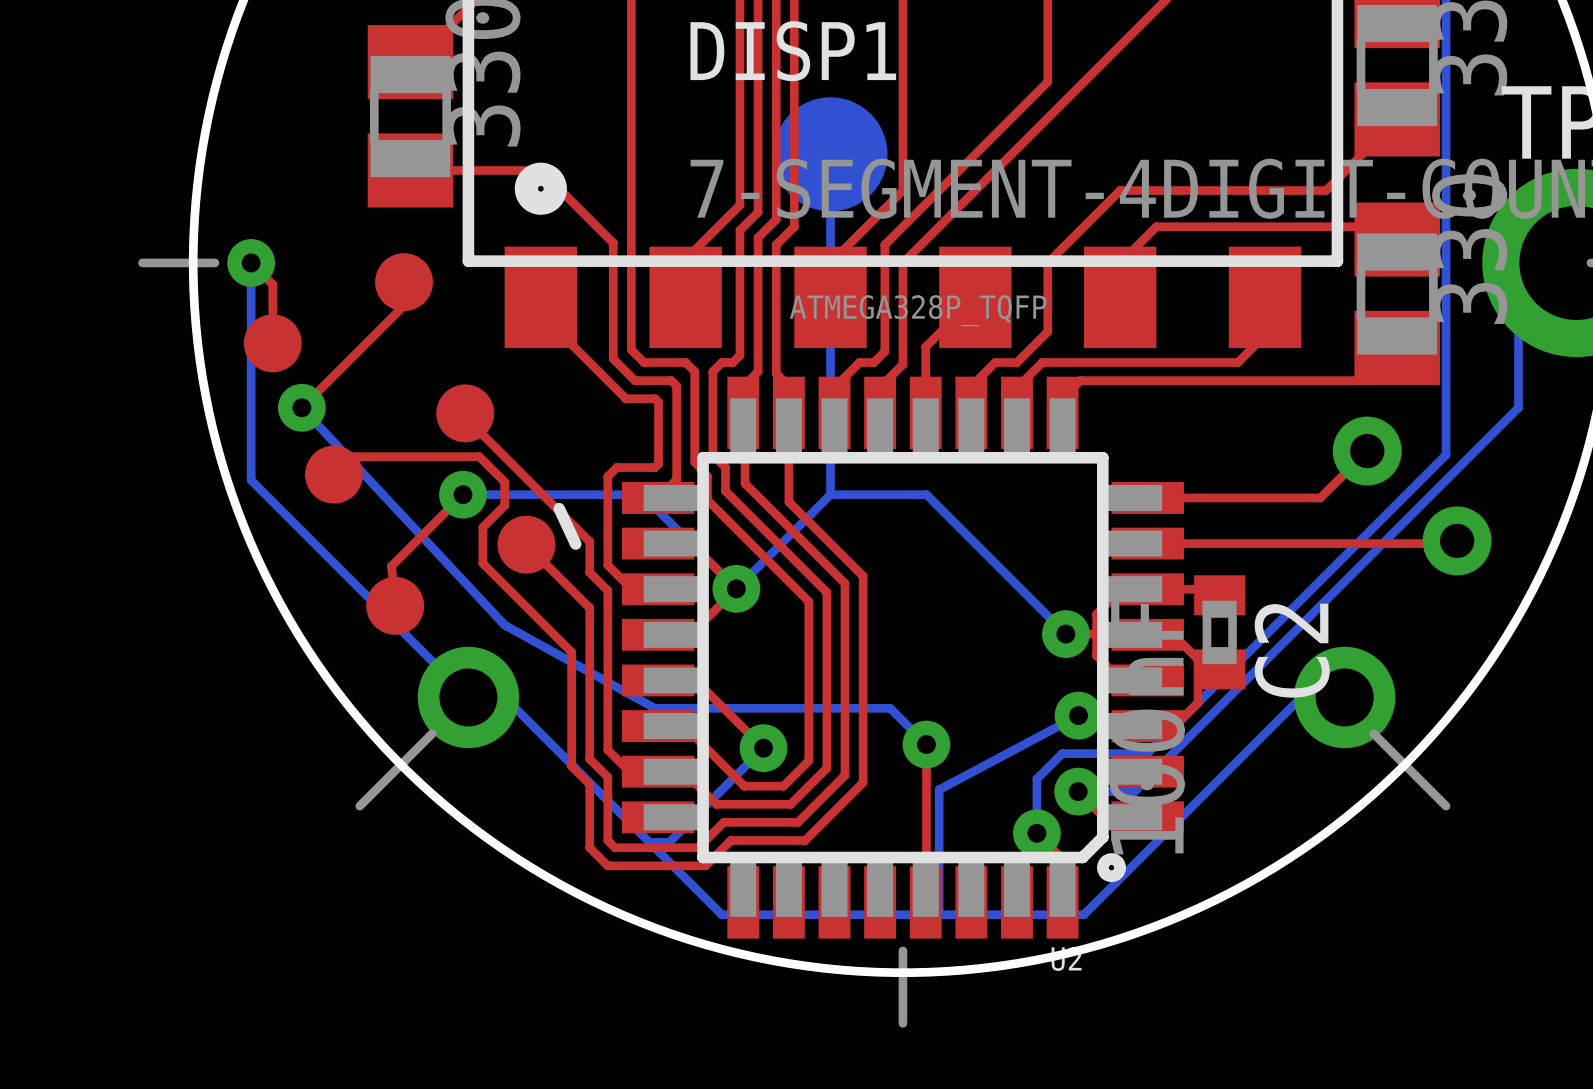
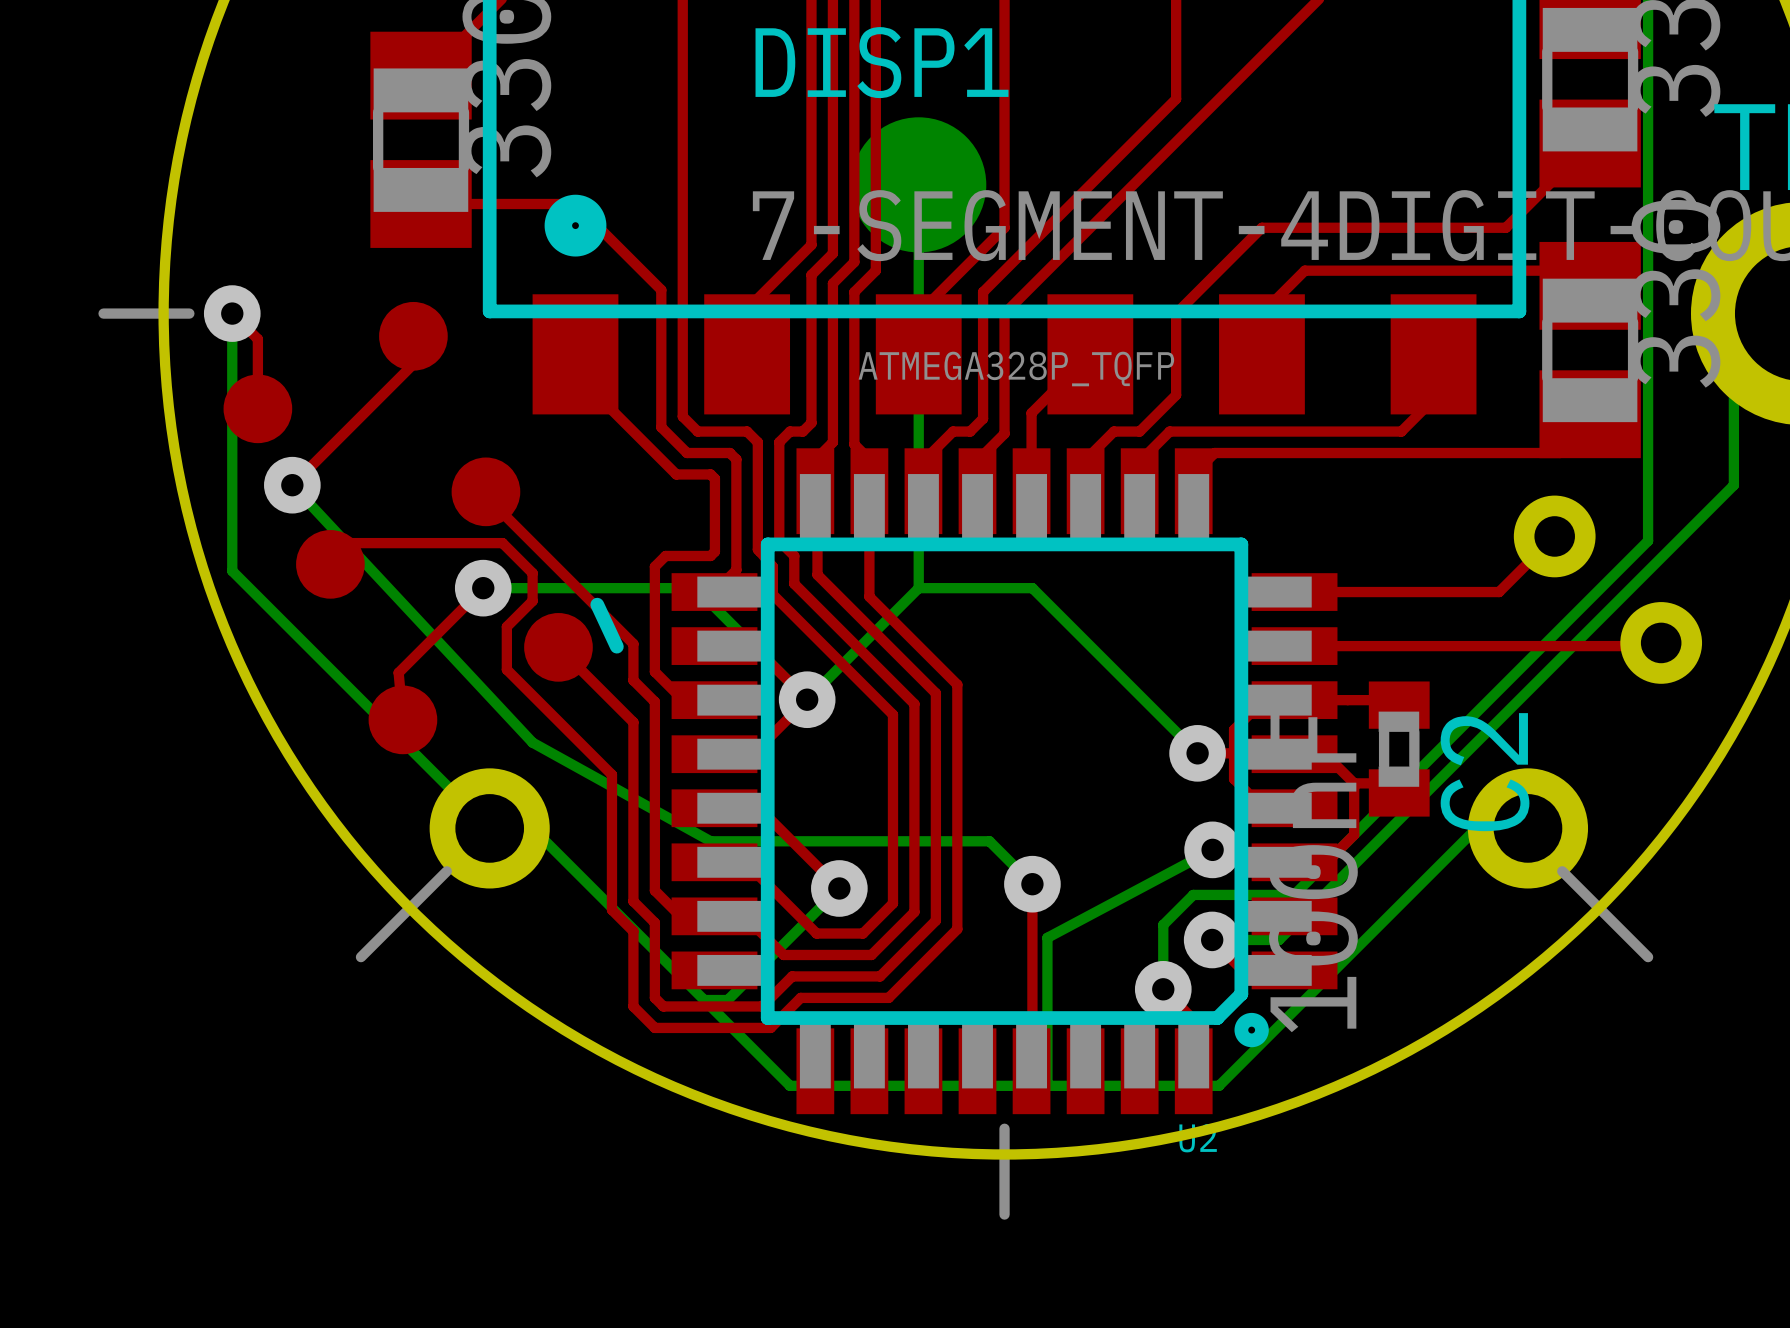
C2 position: (1219, 632) -> (1399, 749)

